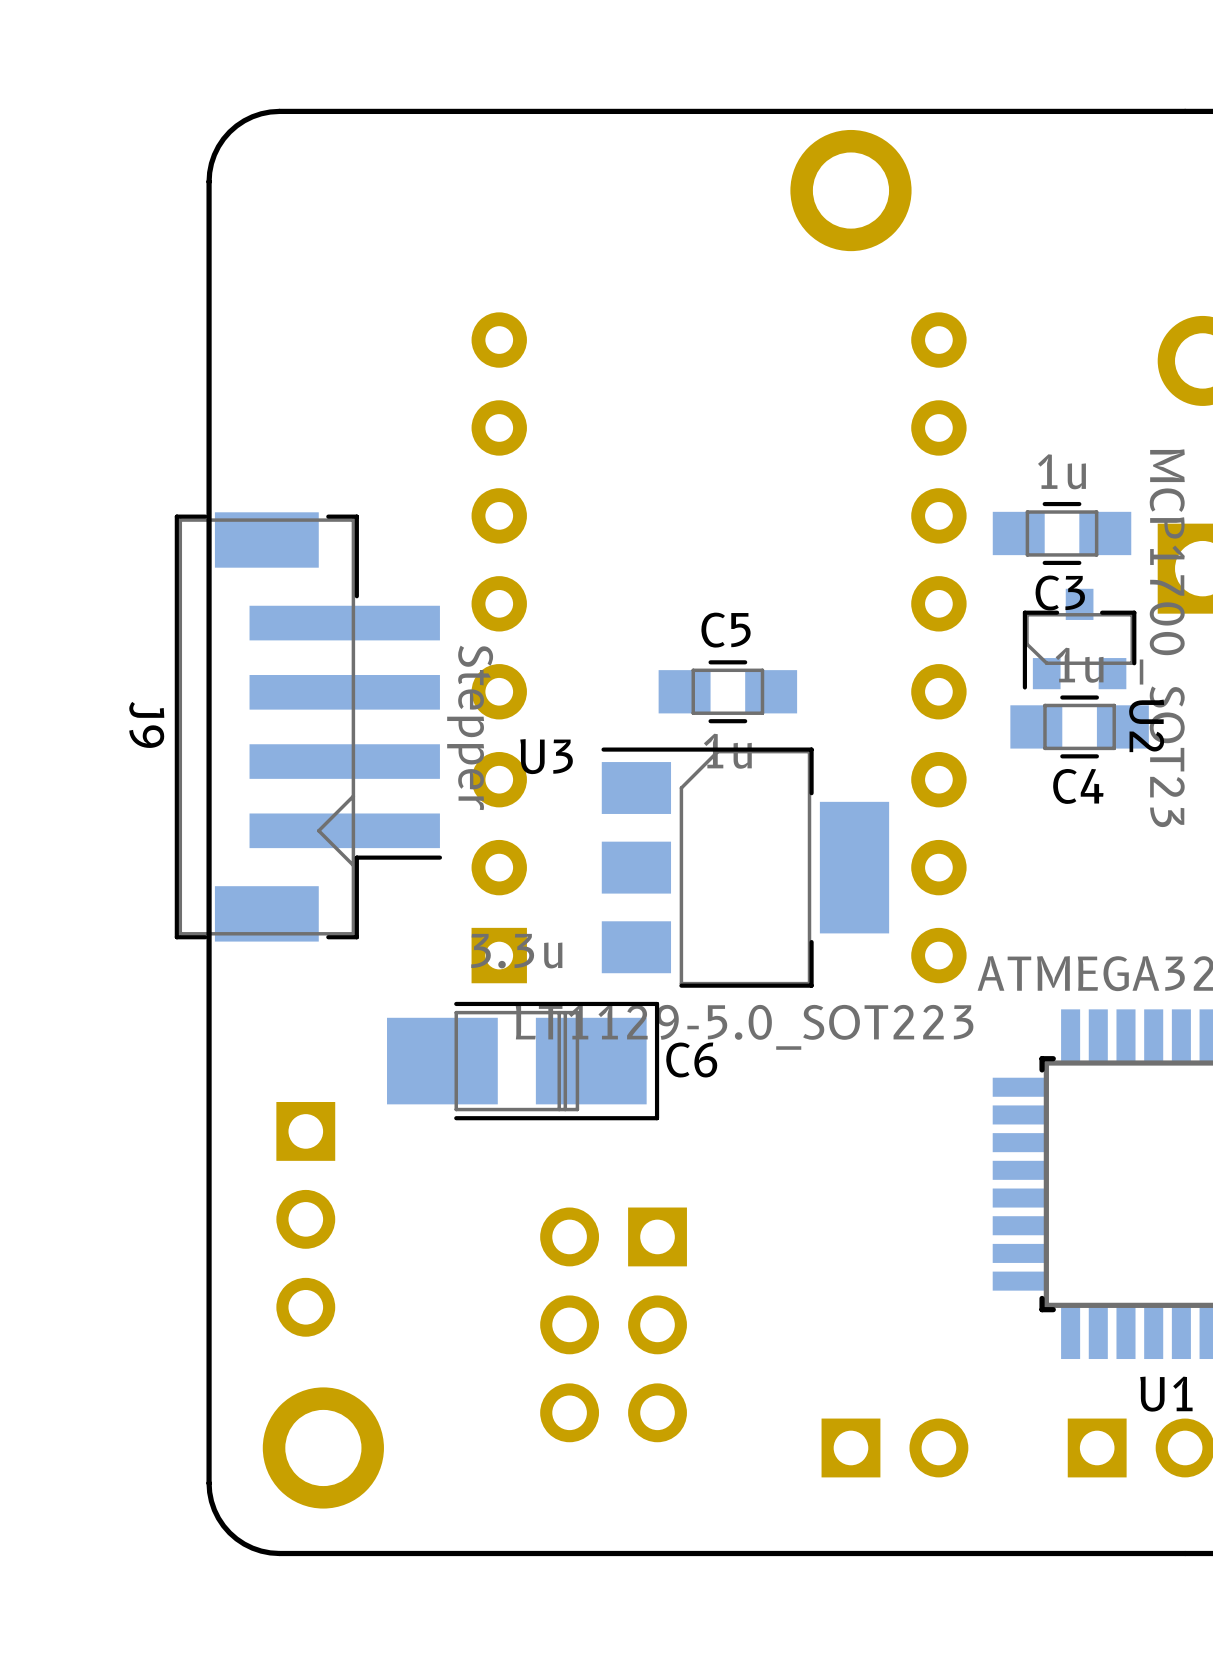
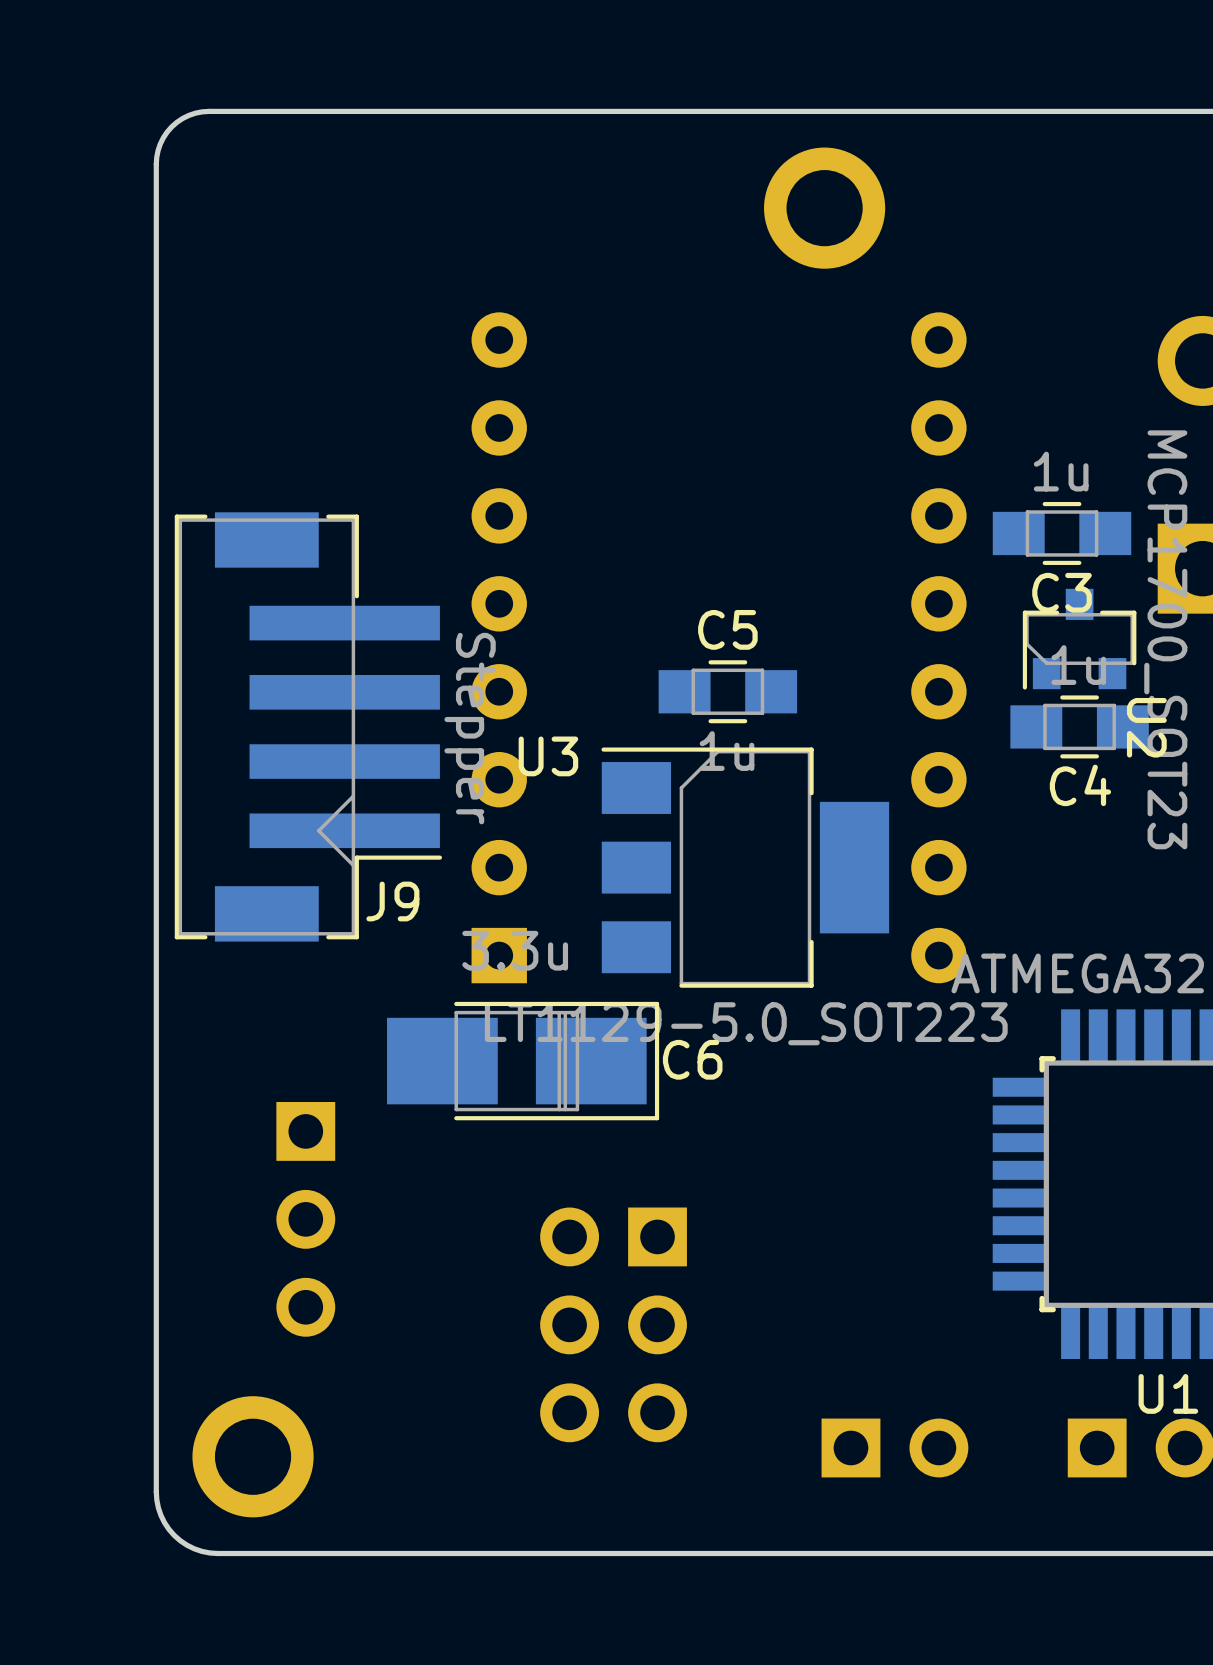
board edge: (279, 111) (252, 116) (229, 132) (214, 154) (209, 181) (209, 1483) (214, 1510) (229, 1532) (252, 1548) (279, 1553) -> (279, 111) (209, 111) (188, 115) (176, 122) (163, 137) (158, 150) (156, 164) (156, 1499) (160, 1515) (169, 1529) (180, 1540) (194, 1548) (217, 1553) (279, 1553)
part position: (850, 190) -> (824, 208)
J9 name rotation: 0° (146, 724) -> 90° counterclockwise (392, 901)
J9 name position: J9 (146, 724) -> J9 (392, 901)
part position: (323, 1447) -> (253, 1456)

